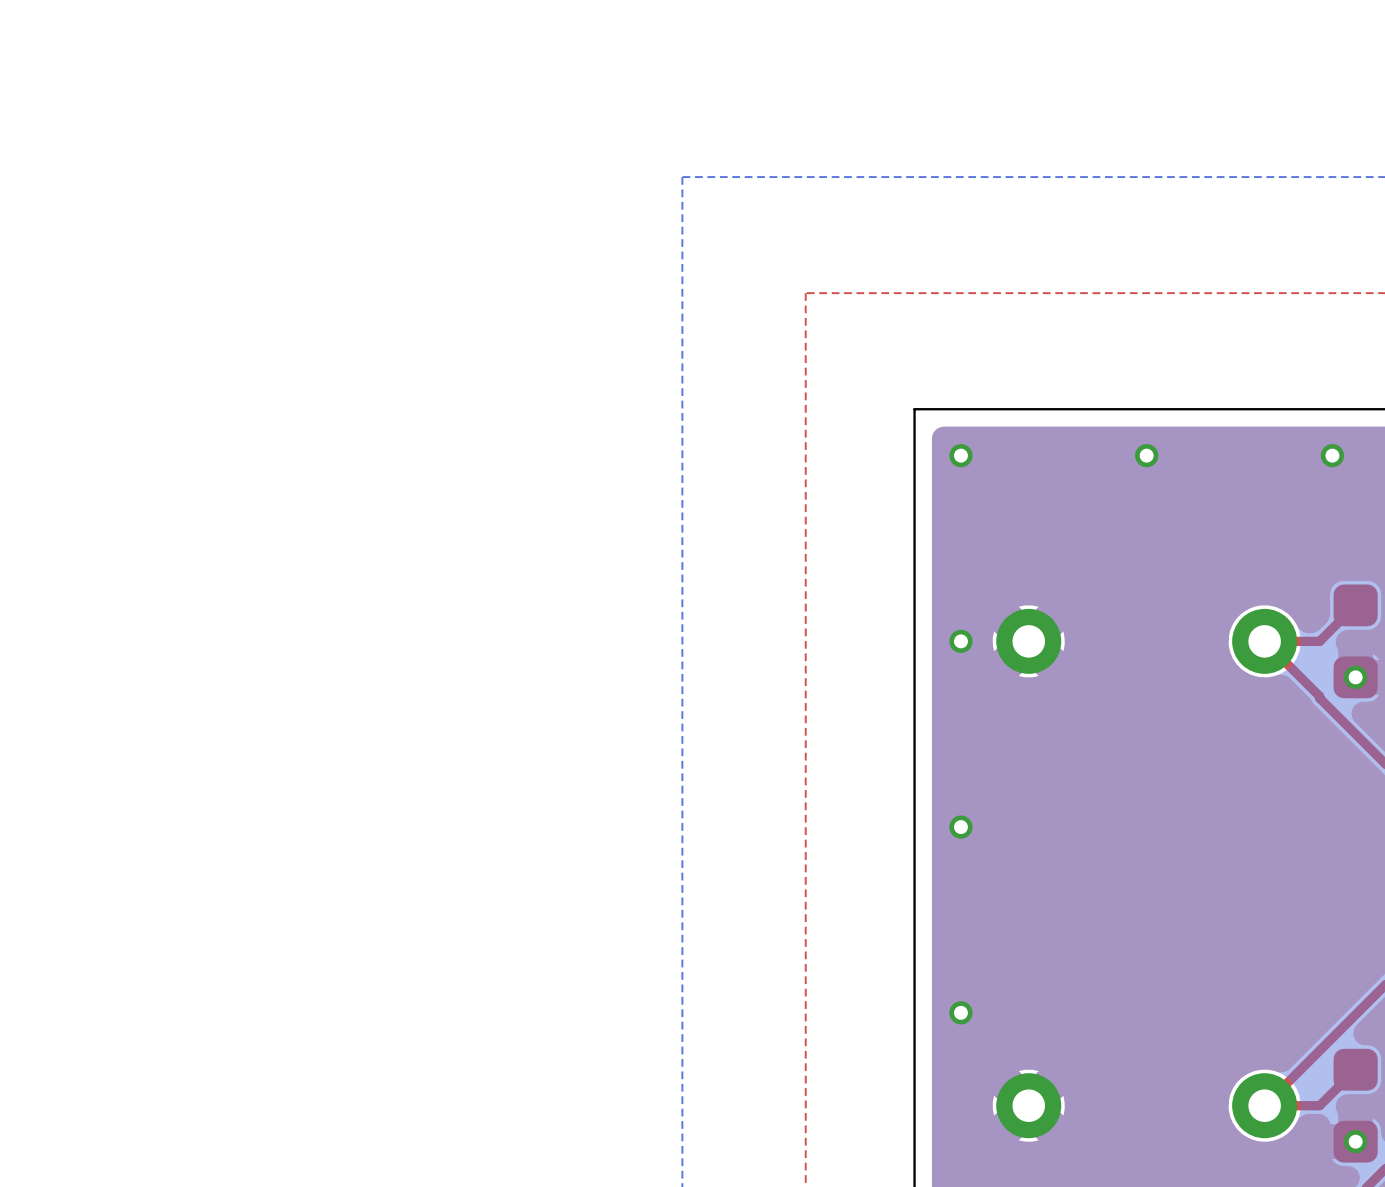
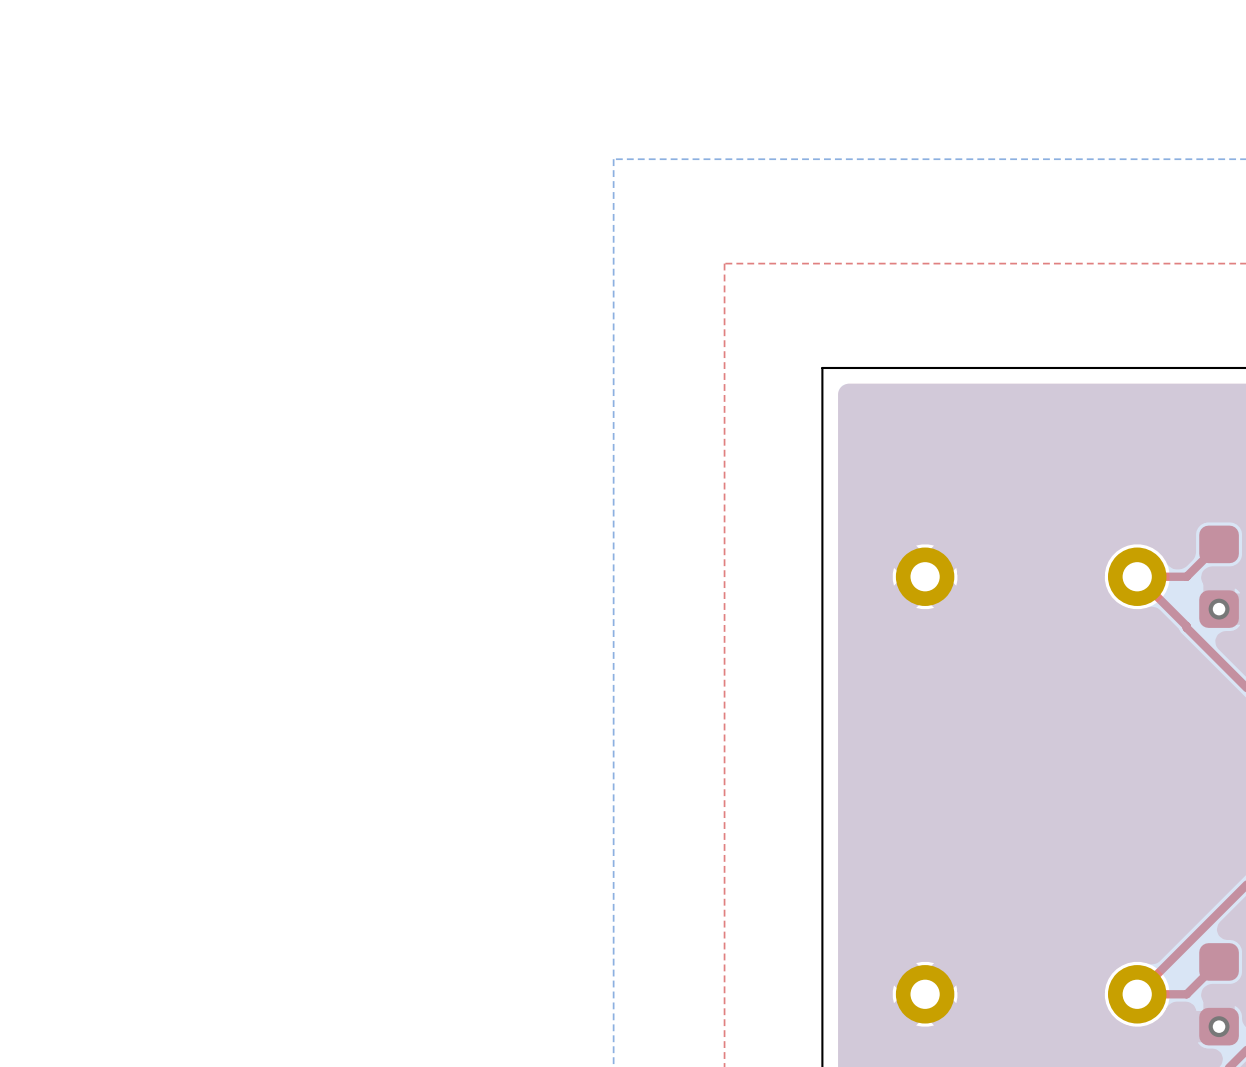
via: (960, 455) -> none
via: (1146, 455) -> none
via: (1332, 455) -> none
via: (960, 641) -> none
via: (960, 827) -> none
via: (960, 1012) -> none

